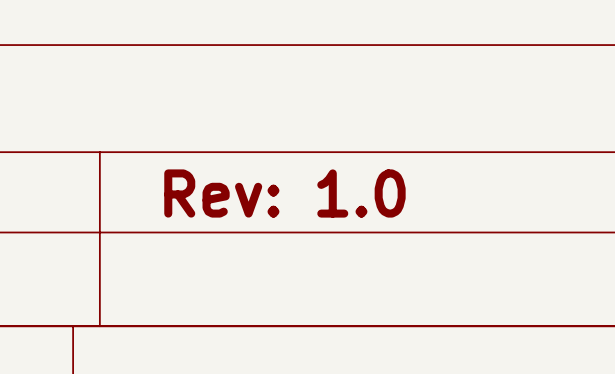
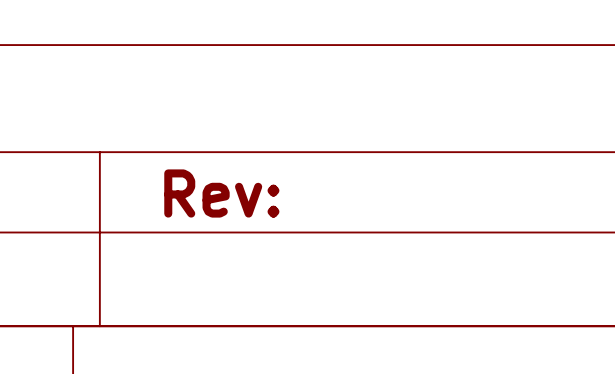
title block: Rev: 1.0 (284, 193) -> Rev: (221, 193)

